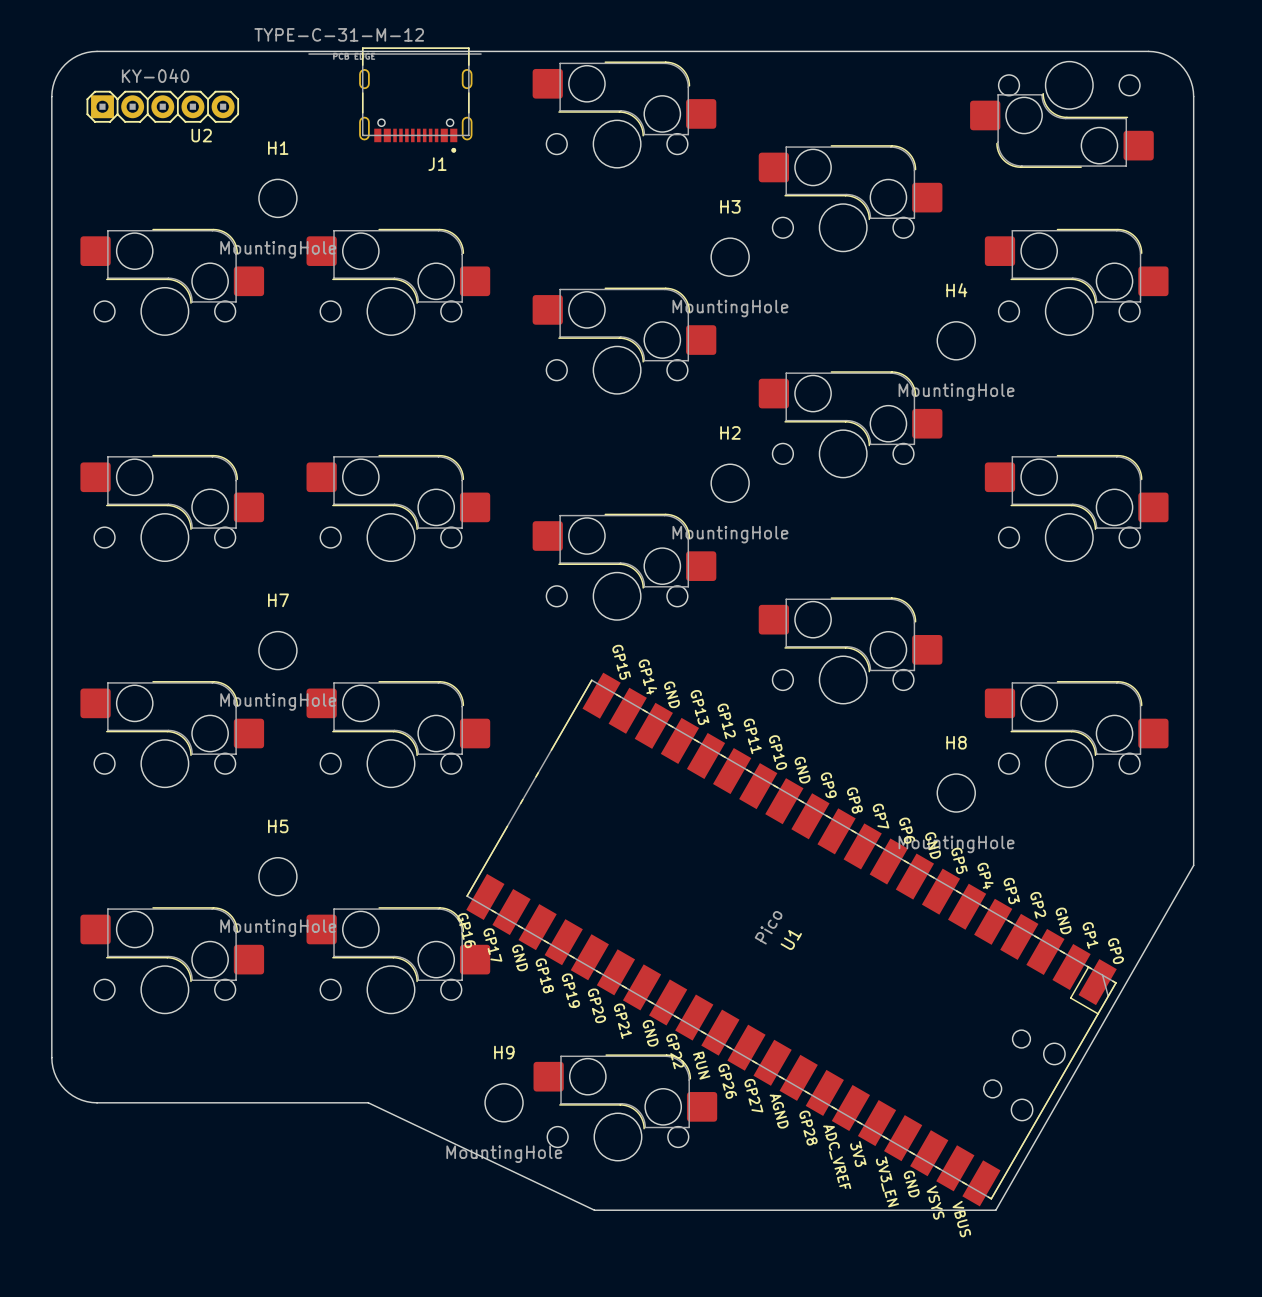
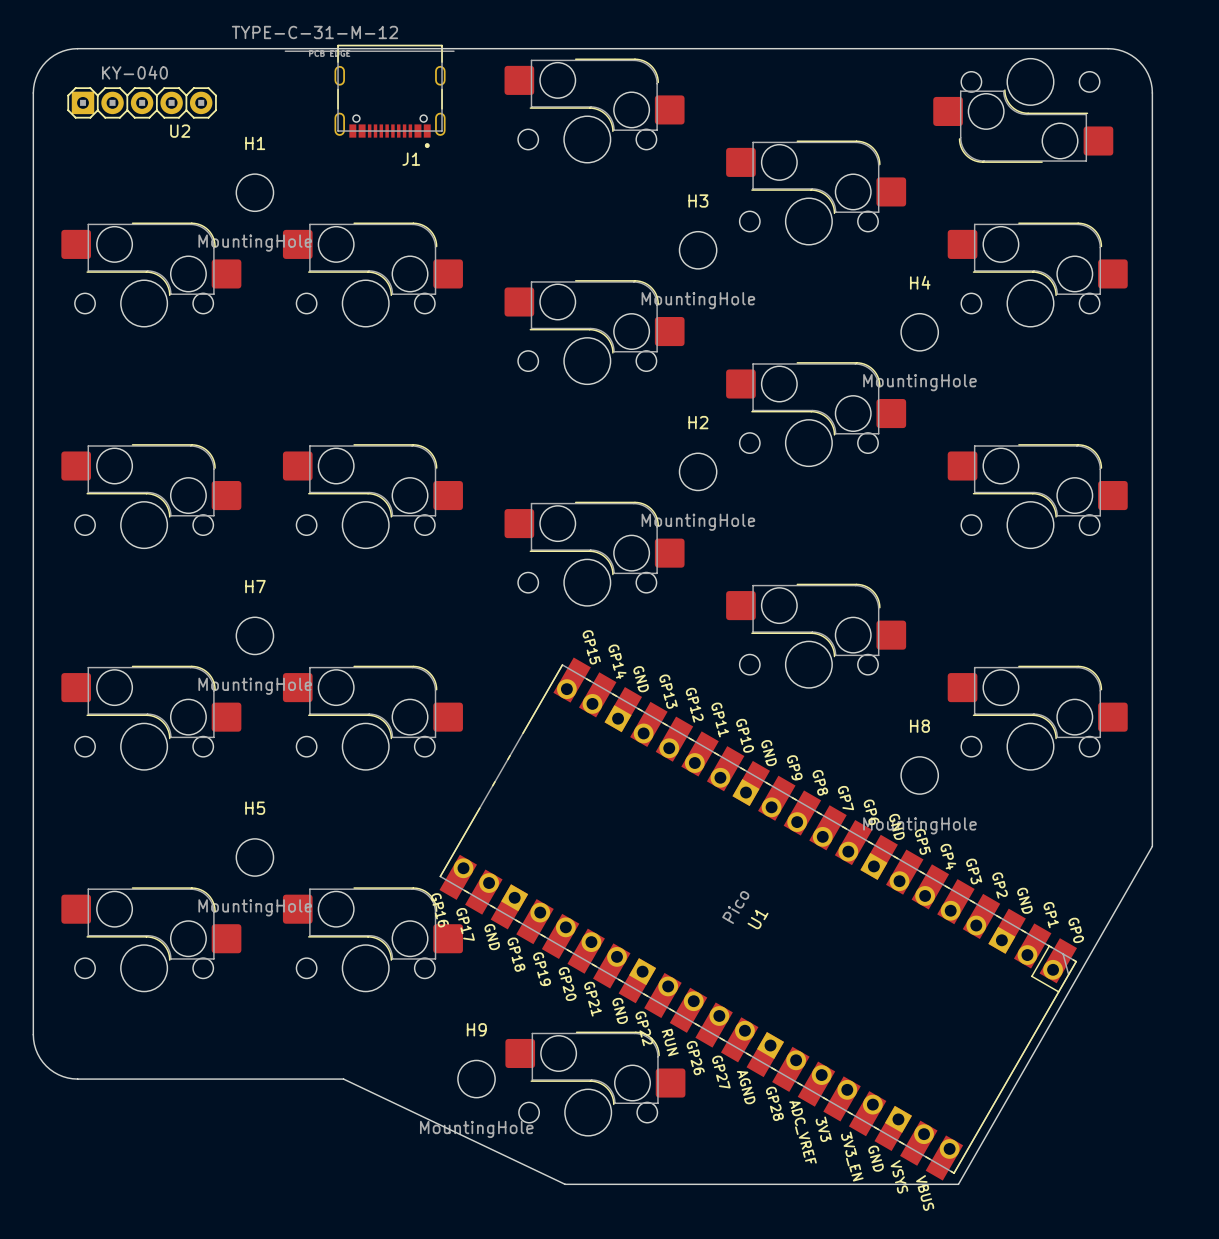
U1 footprint: [466, 672, 1117, 1207] -> [439, 657, 1078, 1181]

